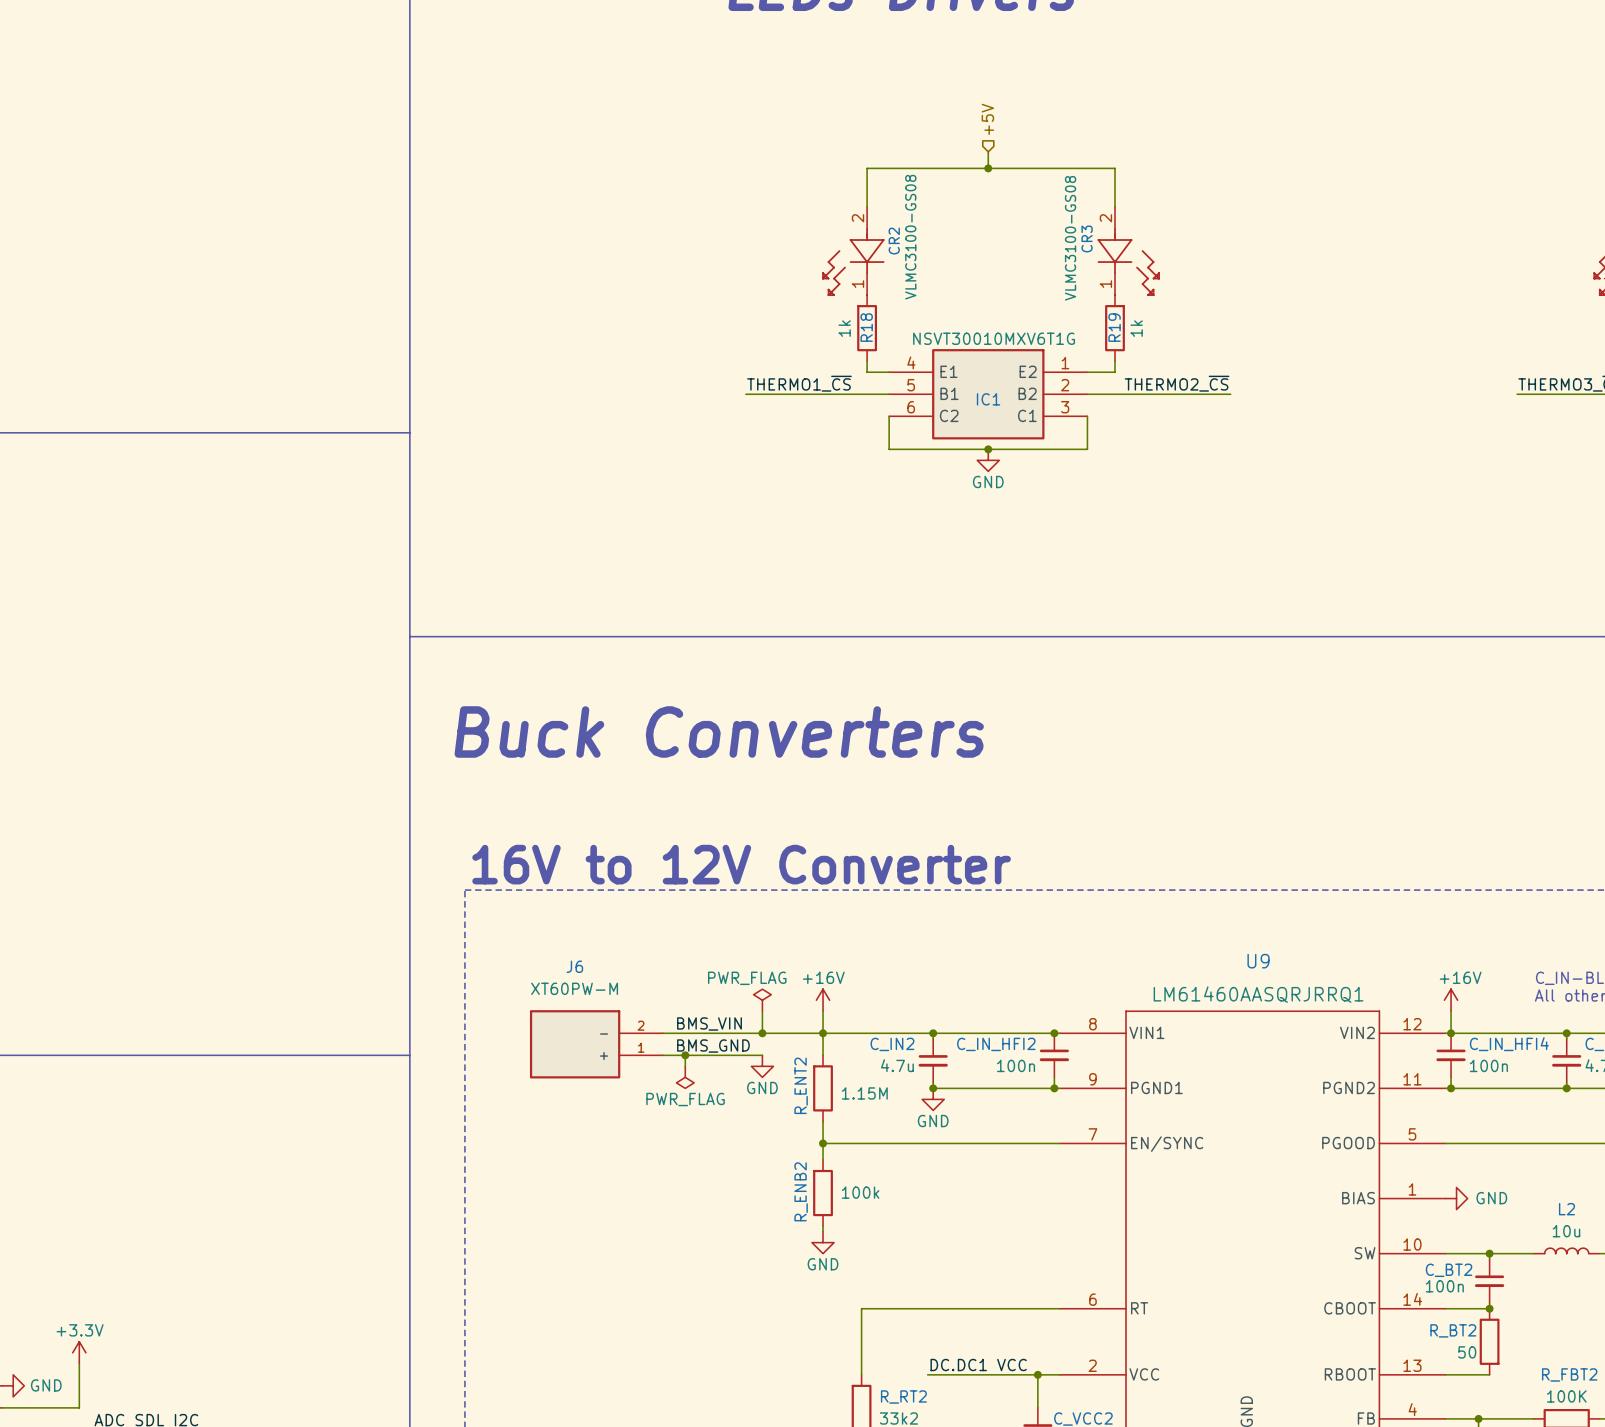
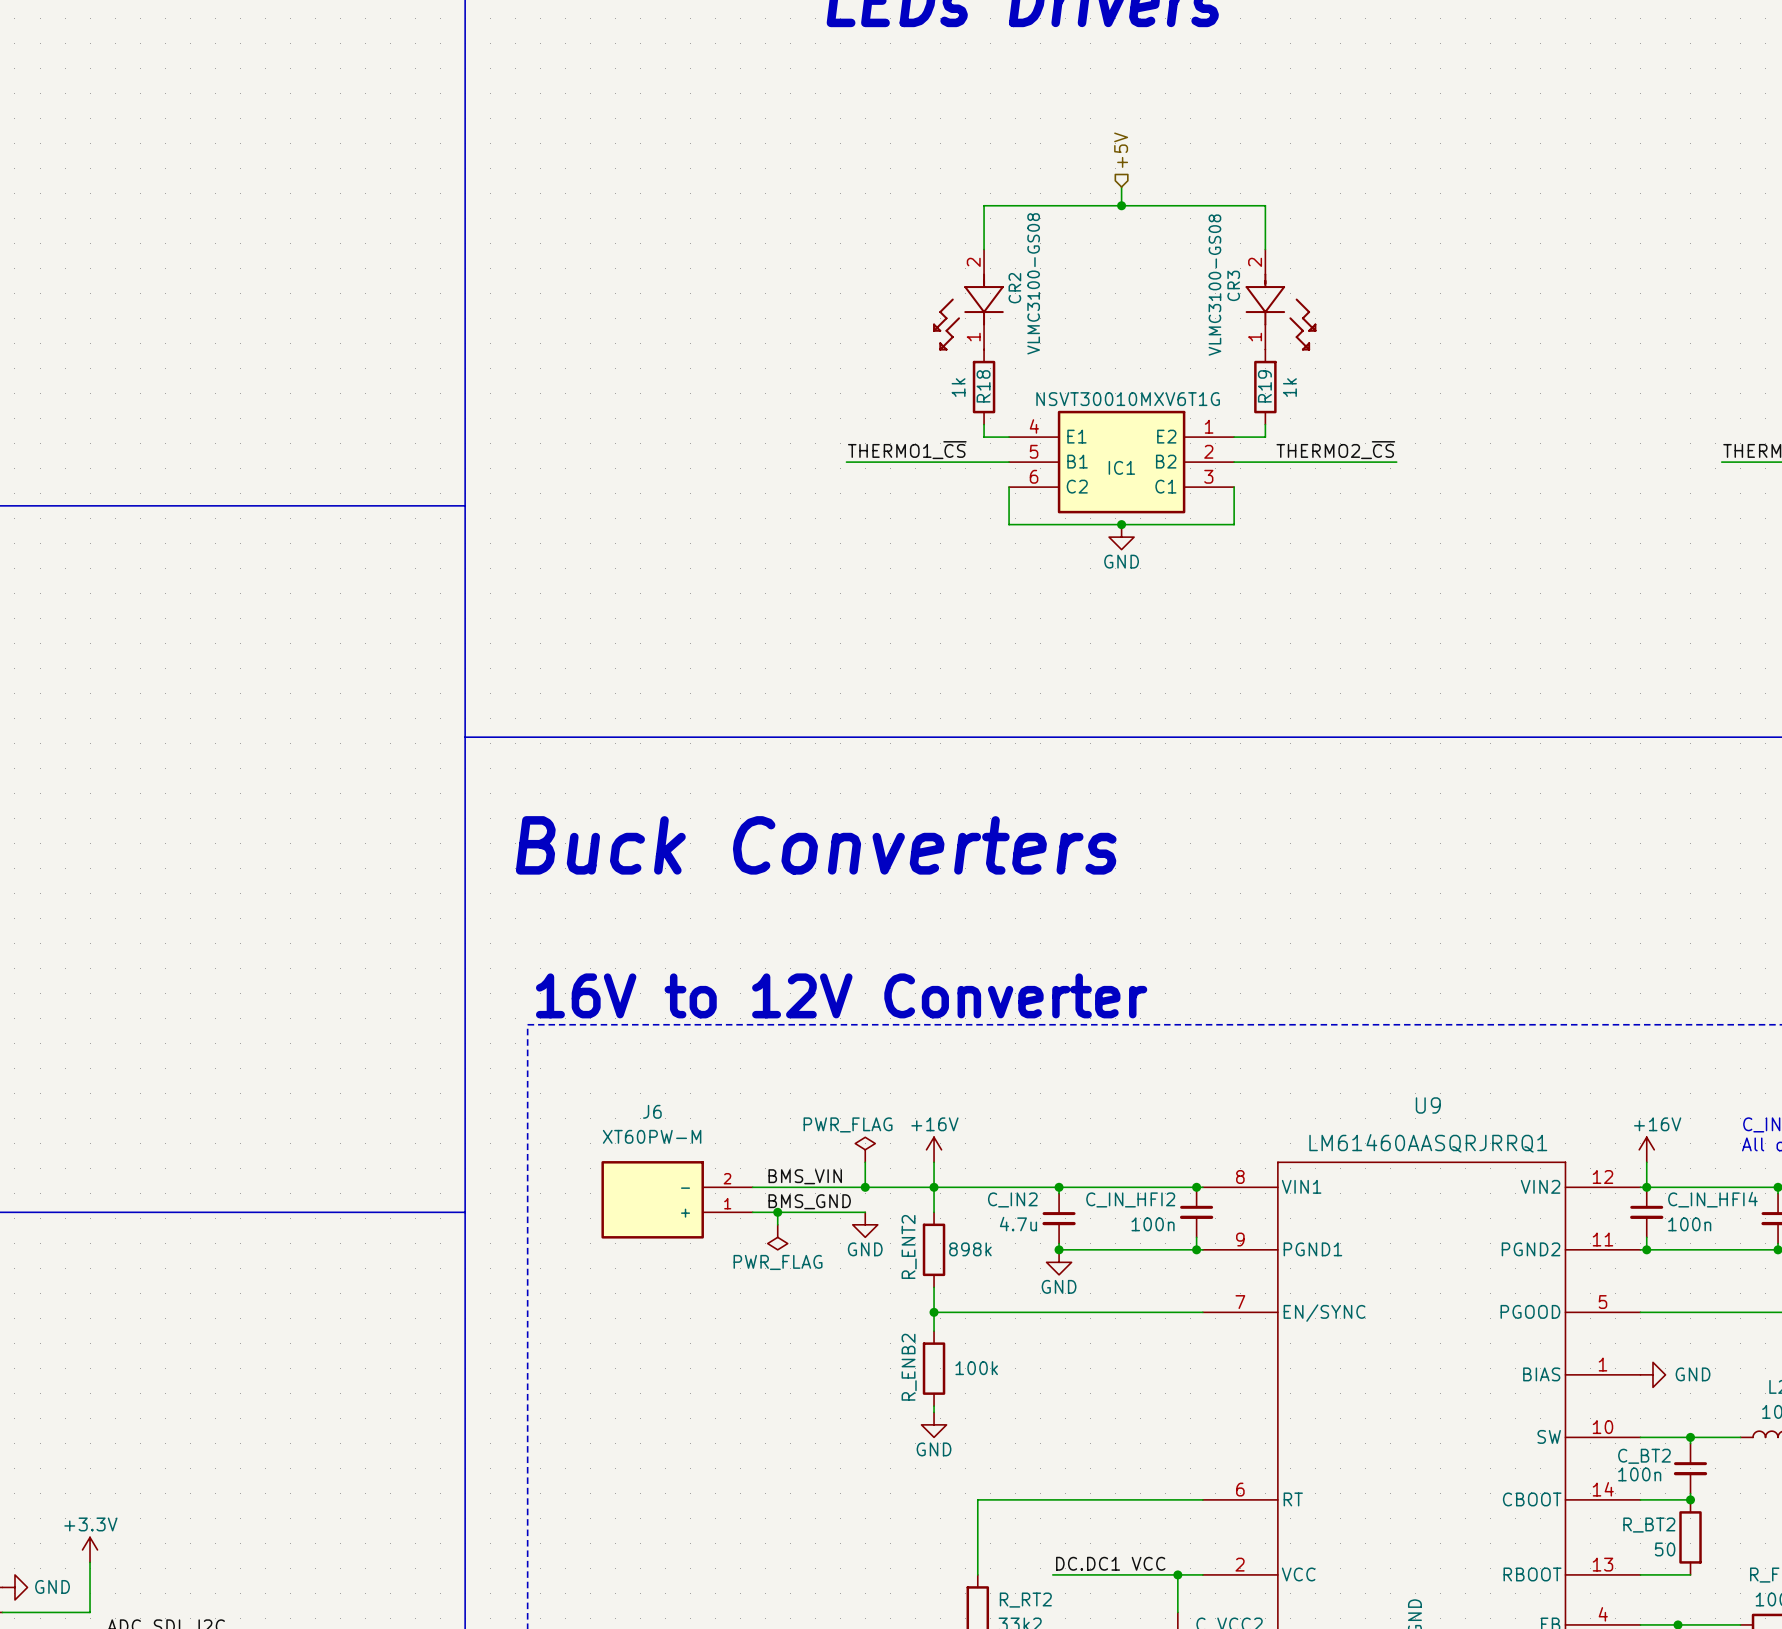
R_ENT2 value: 1.15M (864, 1093) -> 898k (970, 1249)

